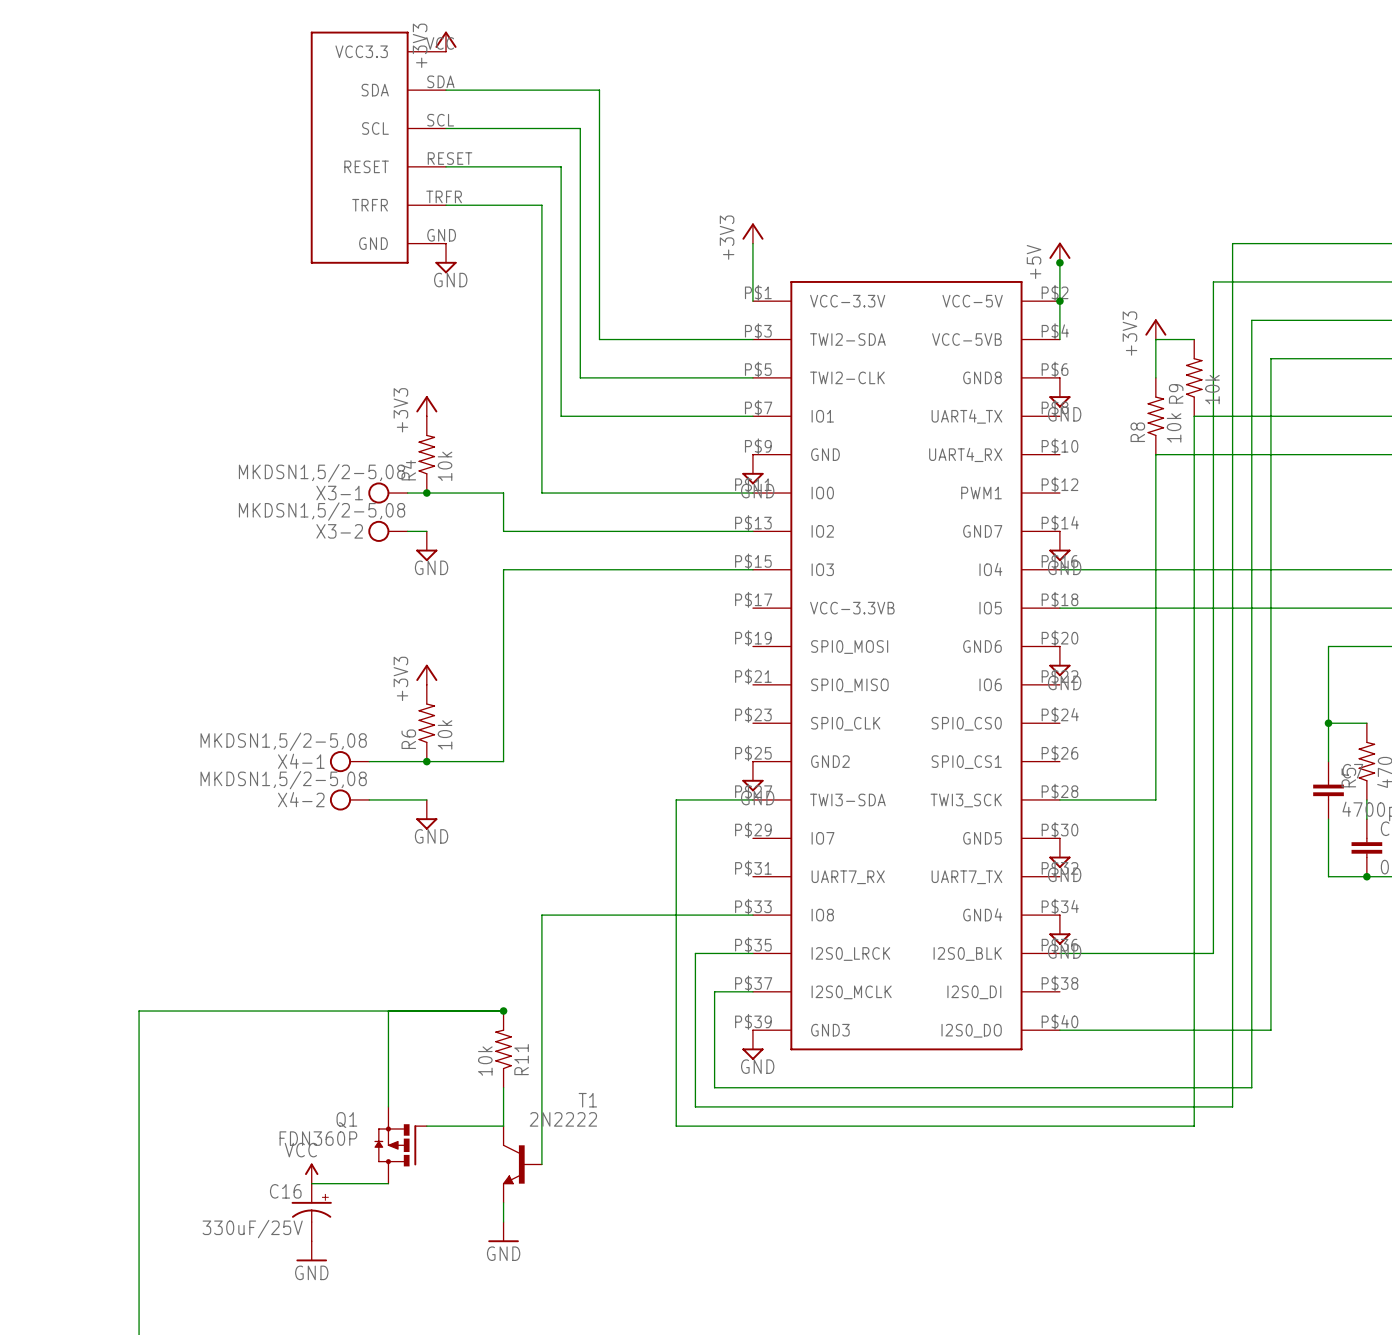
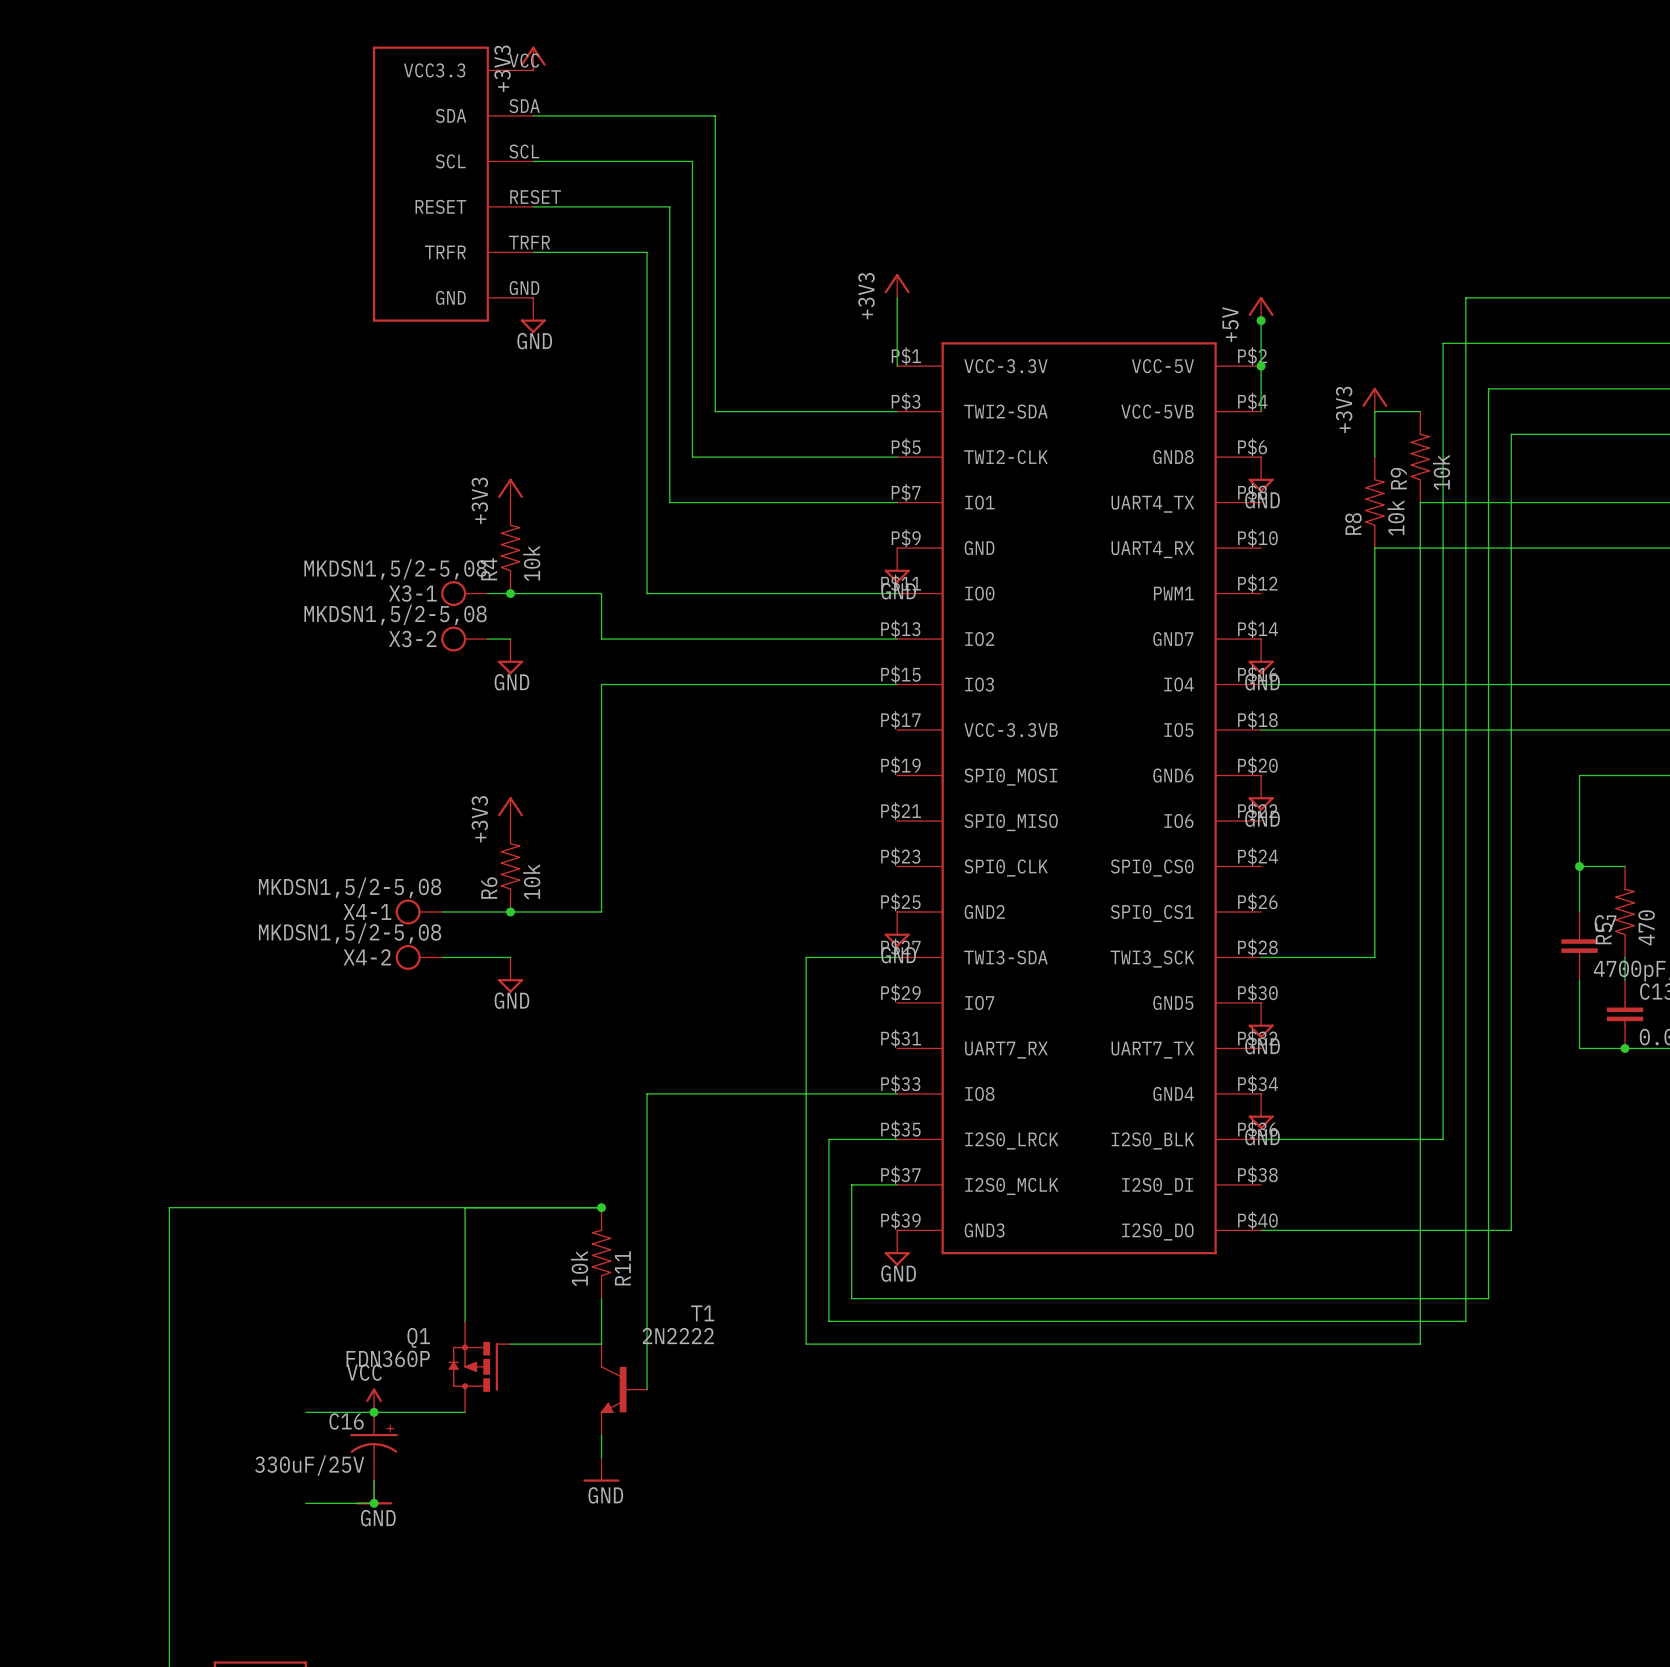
wire: none -> (305, 1412) (374, 1412)
junction: none -> (374, 1412)
wire: none -> (374, 1480) (374, 1503) (305, 1503)
junction: none -> (374, 1503)

